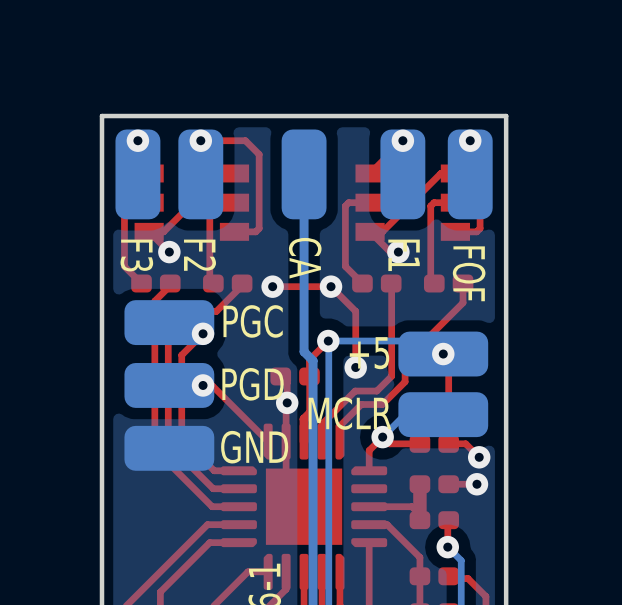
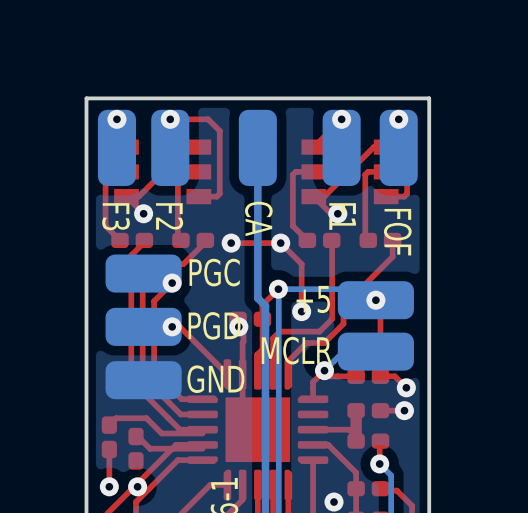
top track: (355, 391) (322, 424) -> (301, 331) (279, 331) (273, 338) (273, 359)
via position: (287, 402) -> (238, 326)
top track: none -> (109, 425) (116, 418) (146, 418) (161, 433) (202, 433)
top track: none -> (136, 436) (150, 448) (202, 448)
part: none -> (109, 437)
part: none -> (136, 448)
top track: none -> (109, 449) (109, 486)
via: none -> (109, 486)
via: none -> (137, 486)
via: none -> (334, 502)

